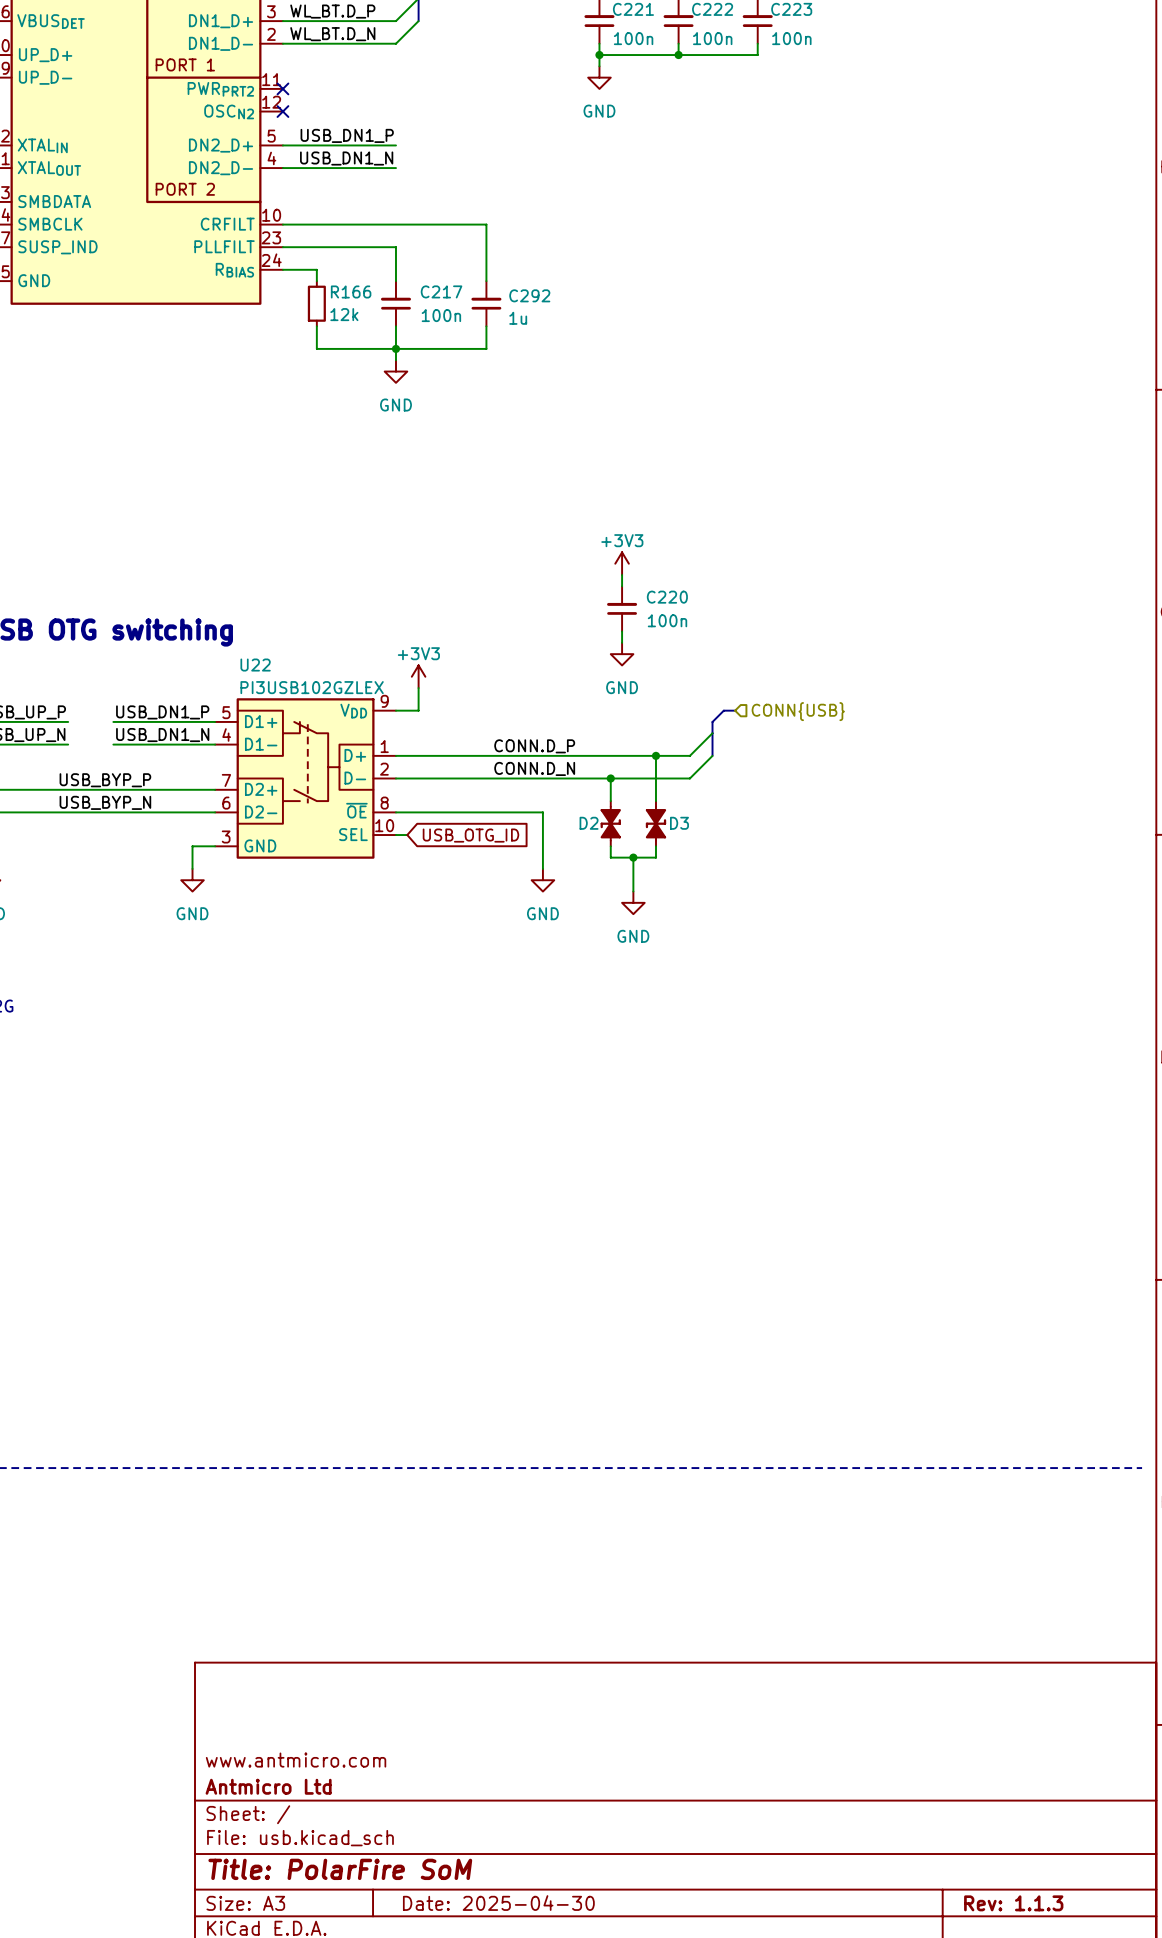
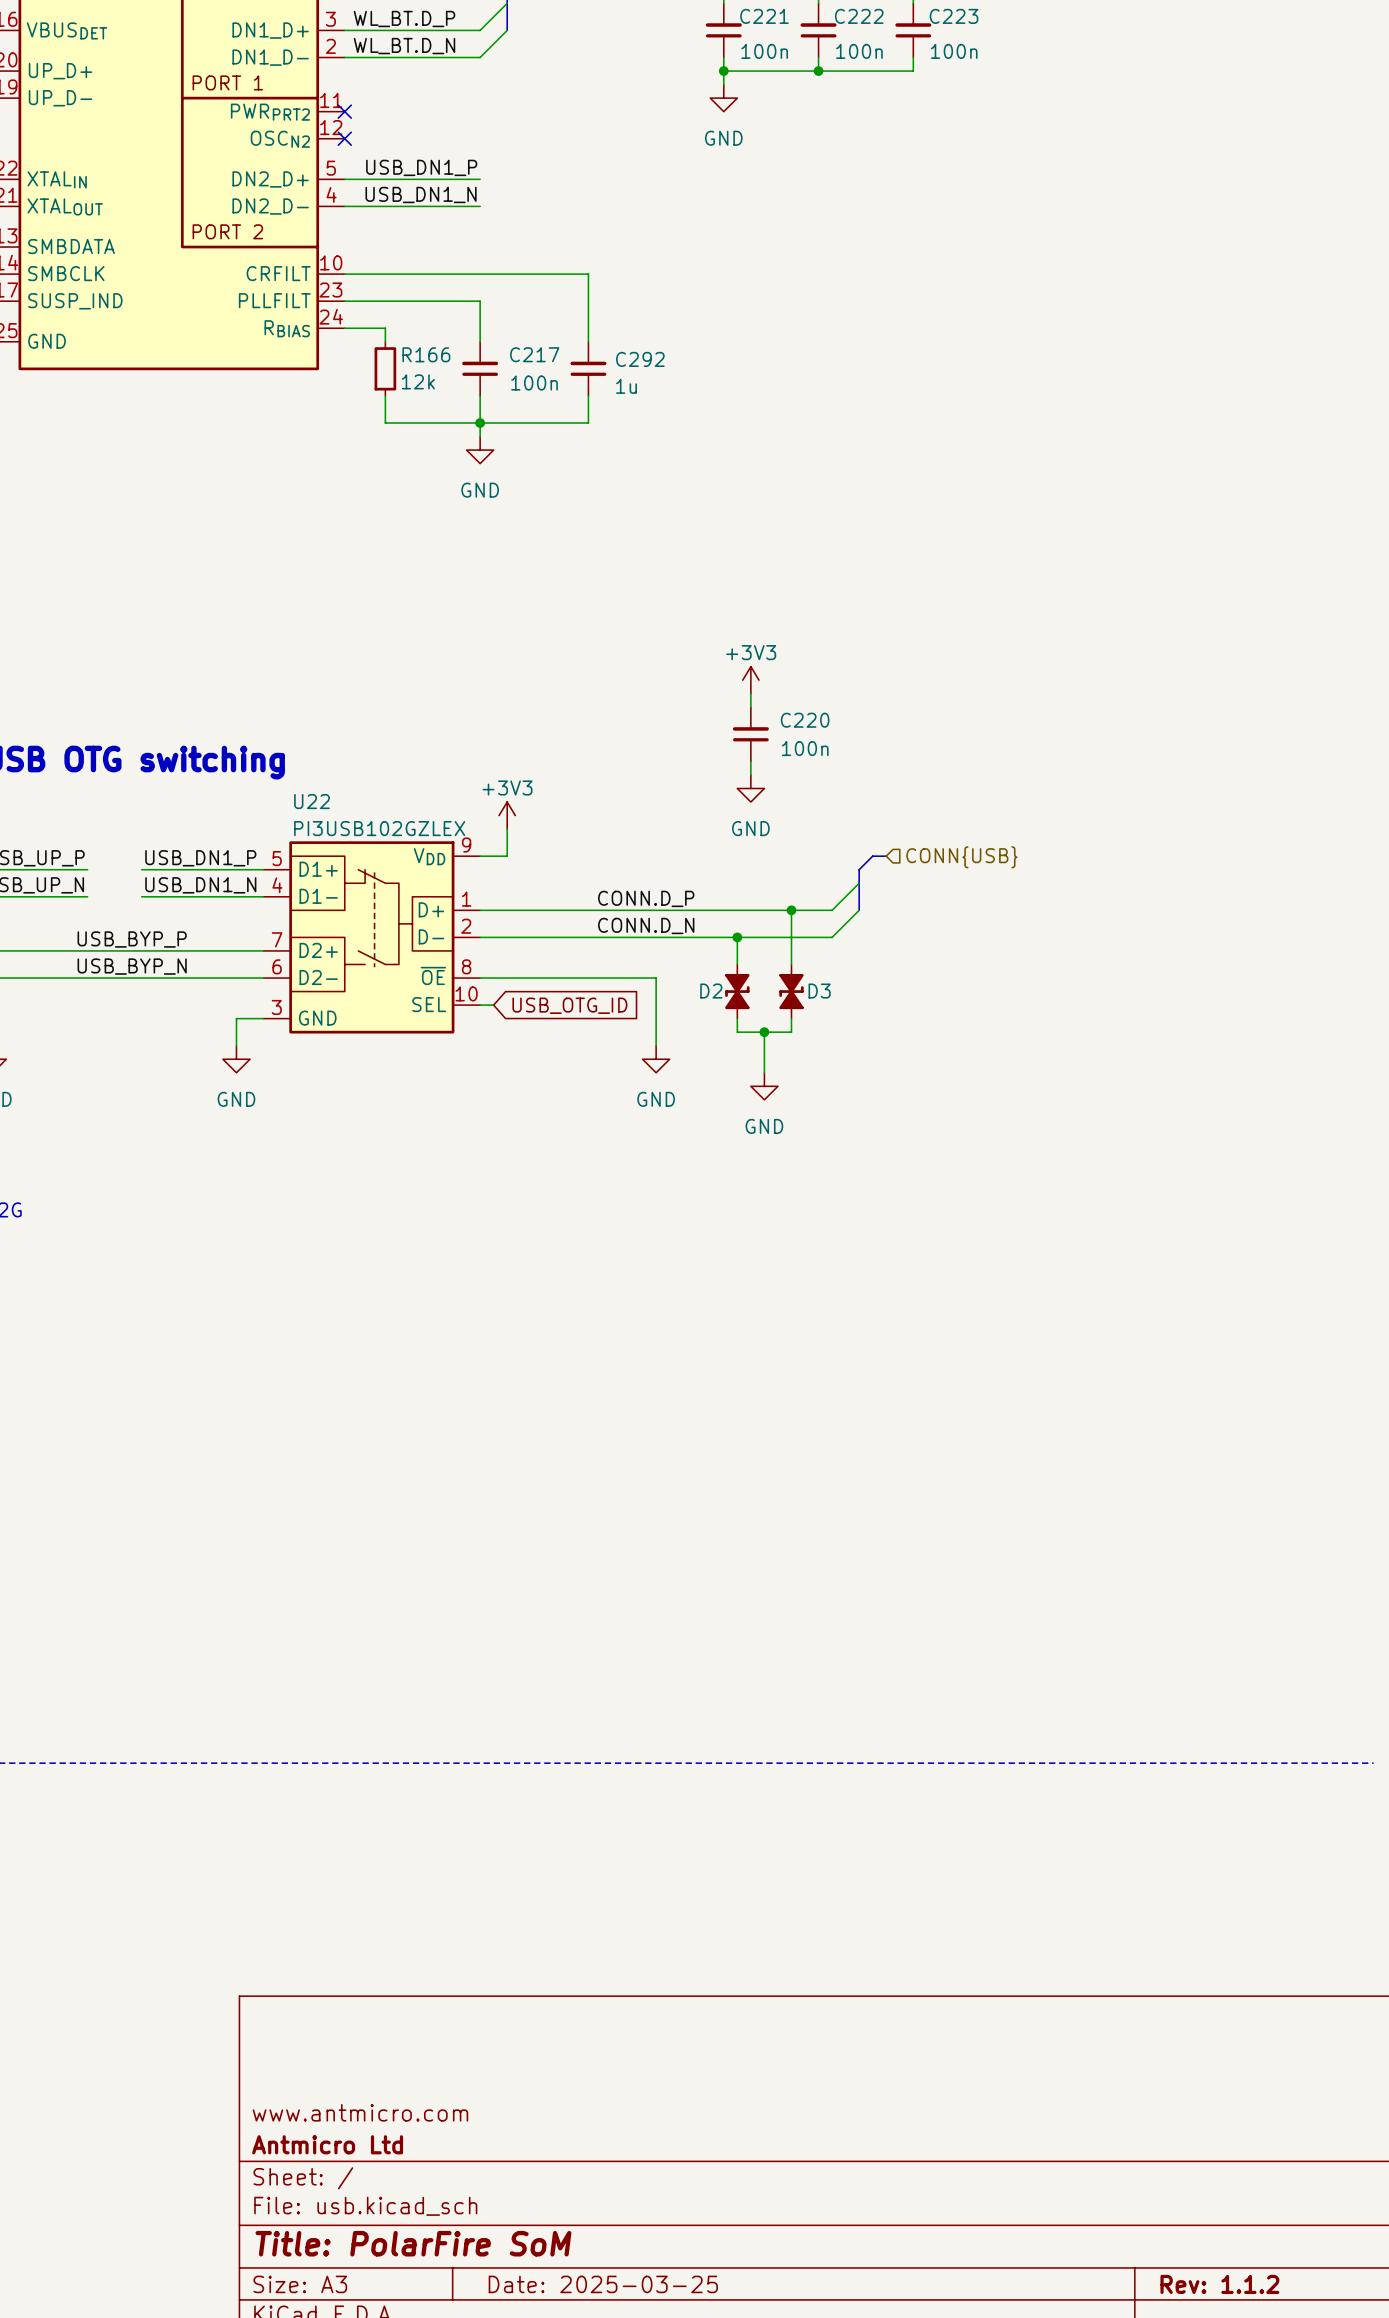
title block: Date: 2025-04-30 (498, 1903) -> Date: 2025-03-25 (603, 2284)
title block: Rev: 1.1.3 (1013, 1903) -> Rev: 1.1.2 (1219, 2284)

